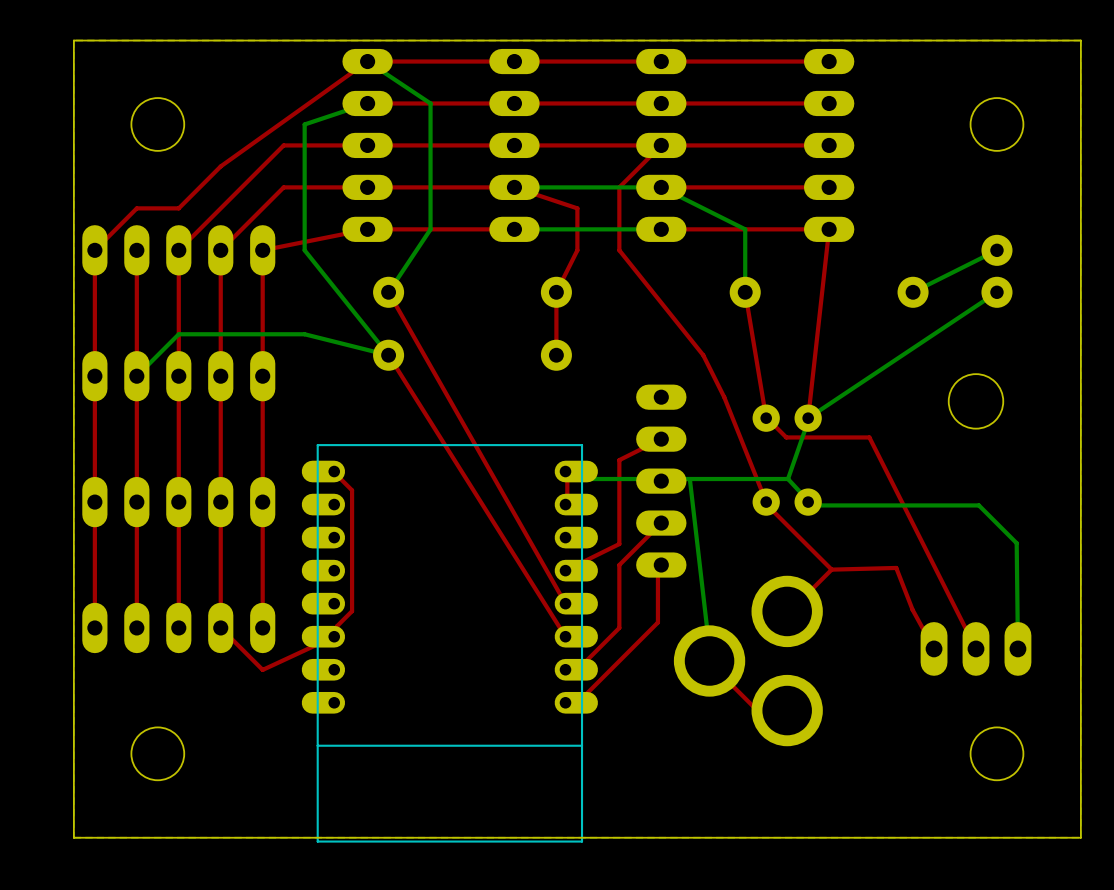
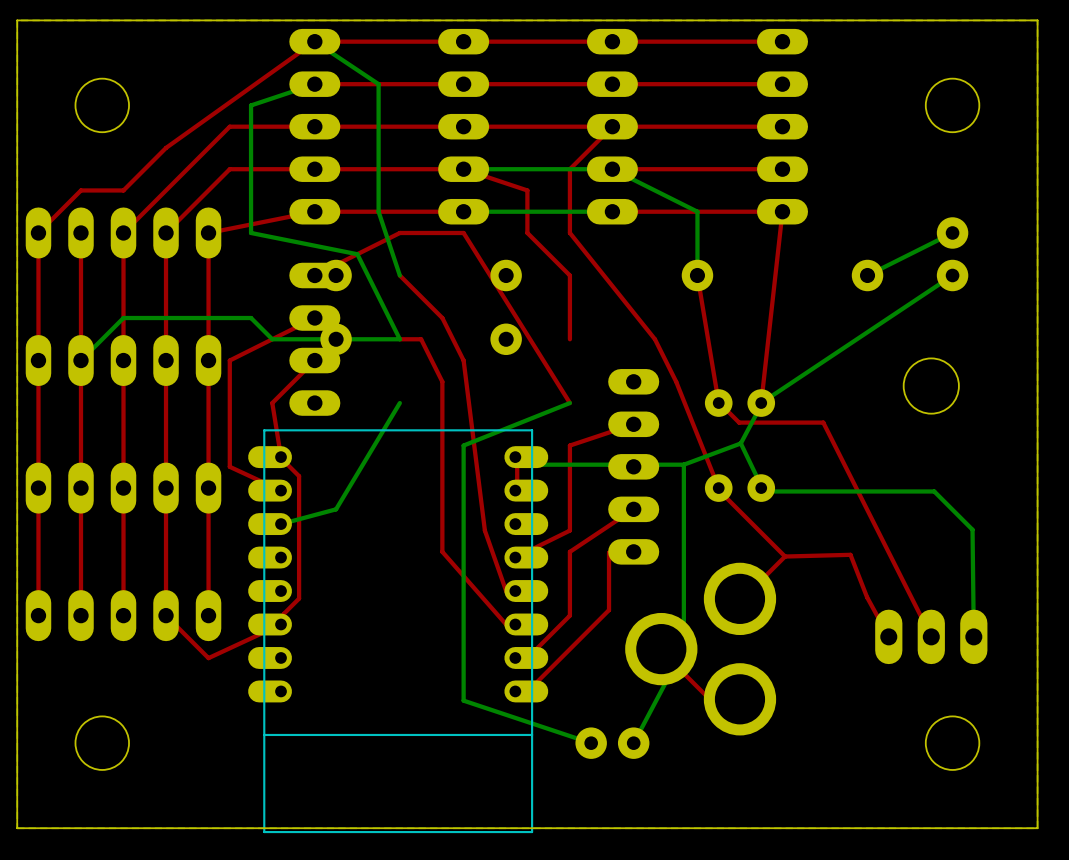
bottom track: (430, 229) (388, 292) -> (378, 211) (399, 275)
bottom track: (304, 250) (388, 355) (304, 334) -> (251, 232) (357, 254) (399, 339) (272, 339) (251, 318)
top track: (577, 250) (556, 292) (556, 355) -> (527, 232) (569, 275) (569, 339)
top track: none -> (314, 275) (399, 232) (463, 232) (569, 403)
top track: (388, 292) (565, 603) -> (399, 275) (442, 318) (463, 360) (484, 530) (506, 591) (515, 591)
top track: none -> (314, 318) (229, 360) (229, 466) (281, 490)
part: none -> (314, 339)
top track: (388, 355) (565, 636) -> (399, 339) (421, 339) (442, 381) (442, 551) (506, 624) (515, 624)
top track: none -> (314, 360) (272, 403) (281, 457)
bottom track: none -> (399, 403) (336, 509) (281, 524)
bottom track: none -> (569, 403) (463, 445) (463, 700) (591, 743)
bottom track: (809, 418) (788, 479) -> (762, 403) (740, 443)
top track: (661, 439) (619, 460) -> (633, 424) (569, 445)
bottom track: none -> (740, 443) (683, 464) (683, 648)
bottom track: (689, 479) (709, 661) -> none
bottom track: (788, 479) (809, 501) -> (740, 443) (762, 487)
bottom track: (788, 479) (731, 479) -> none
part position: (661, 481) -> (633, 466)
top track: (661, 523) (619, 565) -> (633, 509) (569, 551)
bottom track: none -> (683, 648) (633, 743)
part: none -> (612, 743)

